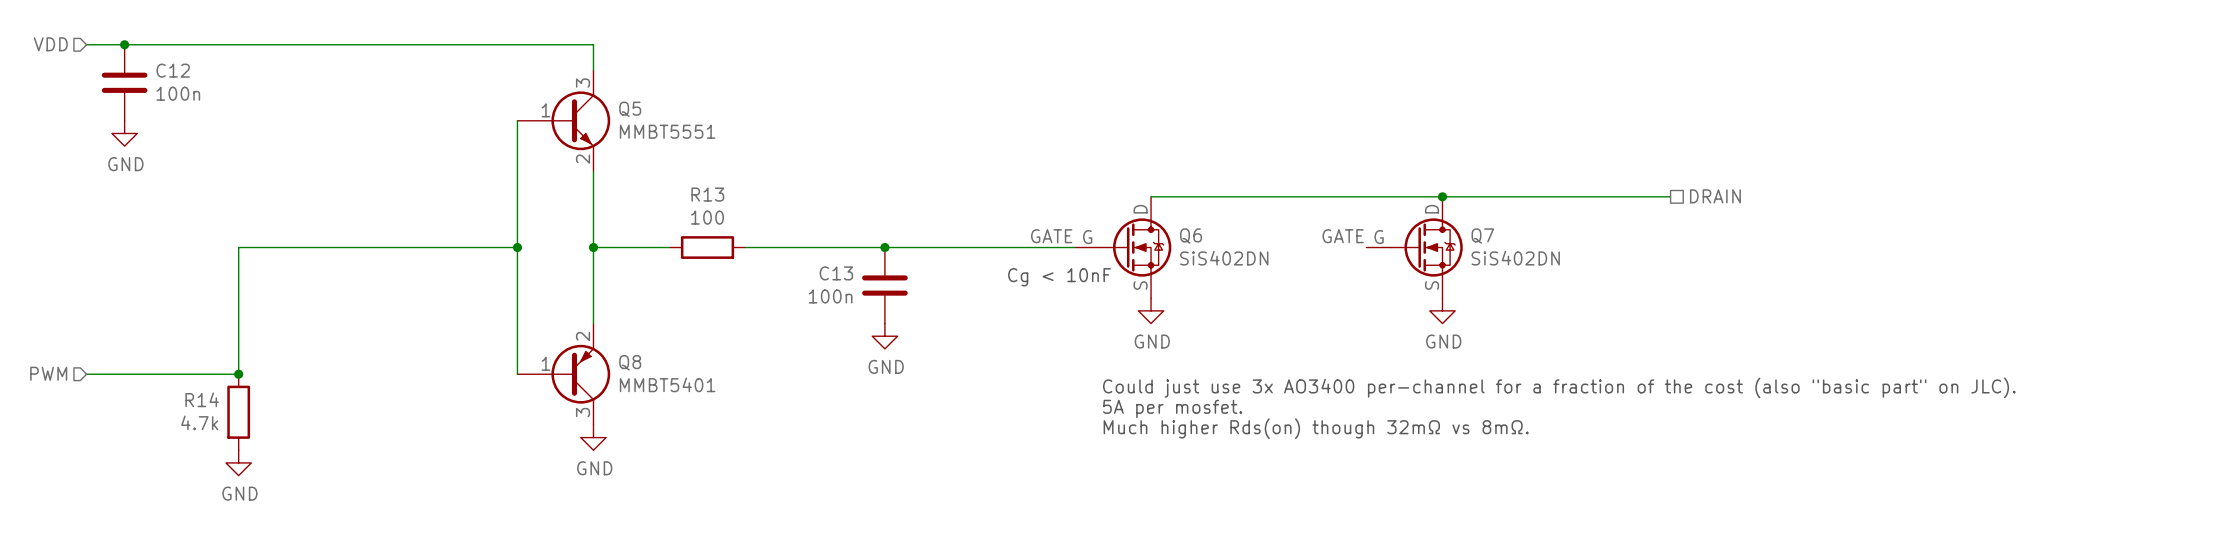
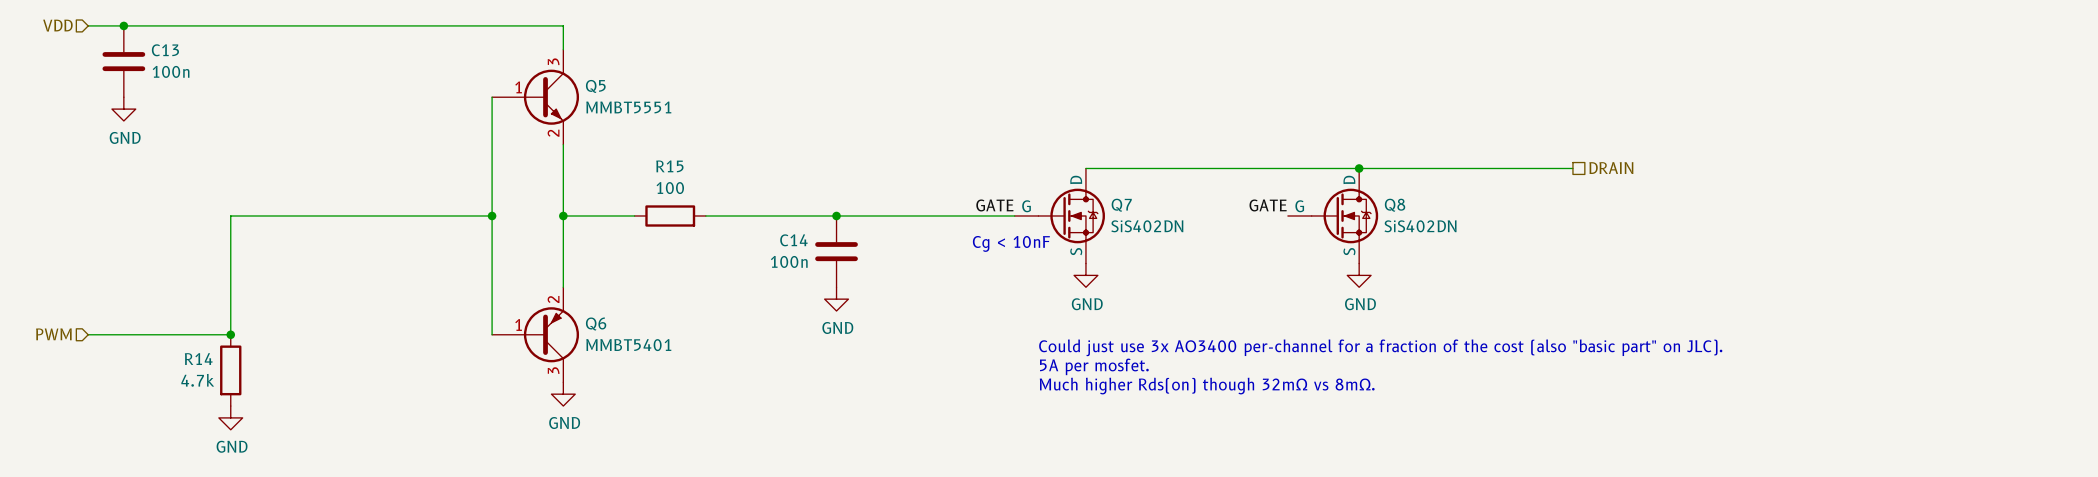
C12 name: C12 (173, 70) -> C13 (165, 50)
R13 name: R13 (707, 194) -> R15 (669, 166)
Q6 name: Q6 (1191, 235) -> Q7 (1121, 205)
Q7 name: Q7 (1482, 235) -> Q8 (1395, 205)
C13 name: C13 (836, 273) -> C14 (793, 240)
Q8 name: Q8 (630, 362) -> Q6 (596, 323)

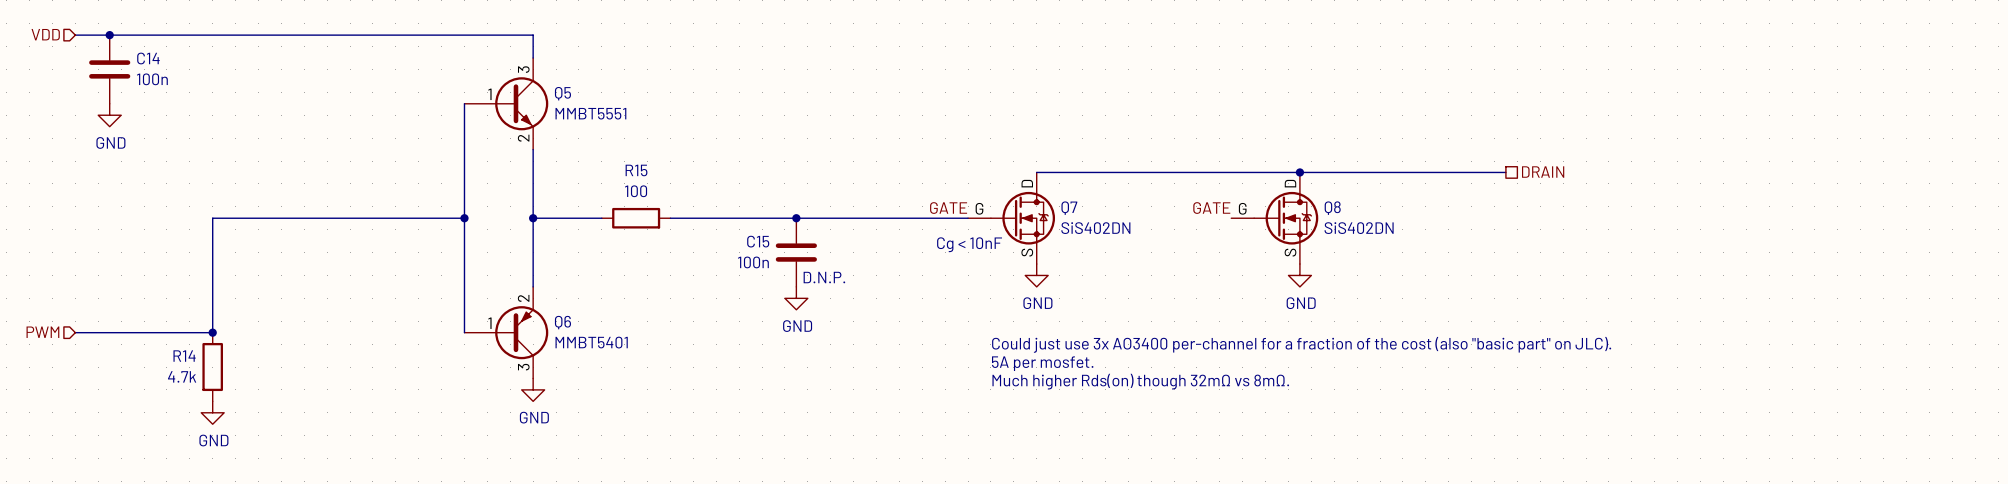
C13 name: C13 (165, 50) -> C14 (148, 58)
C14 name: C14 (793, 240) -> C15 (758, 241)
text: none -> D.N.P. (824, 277)

